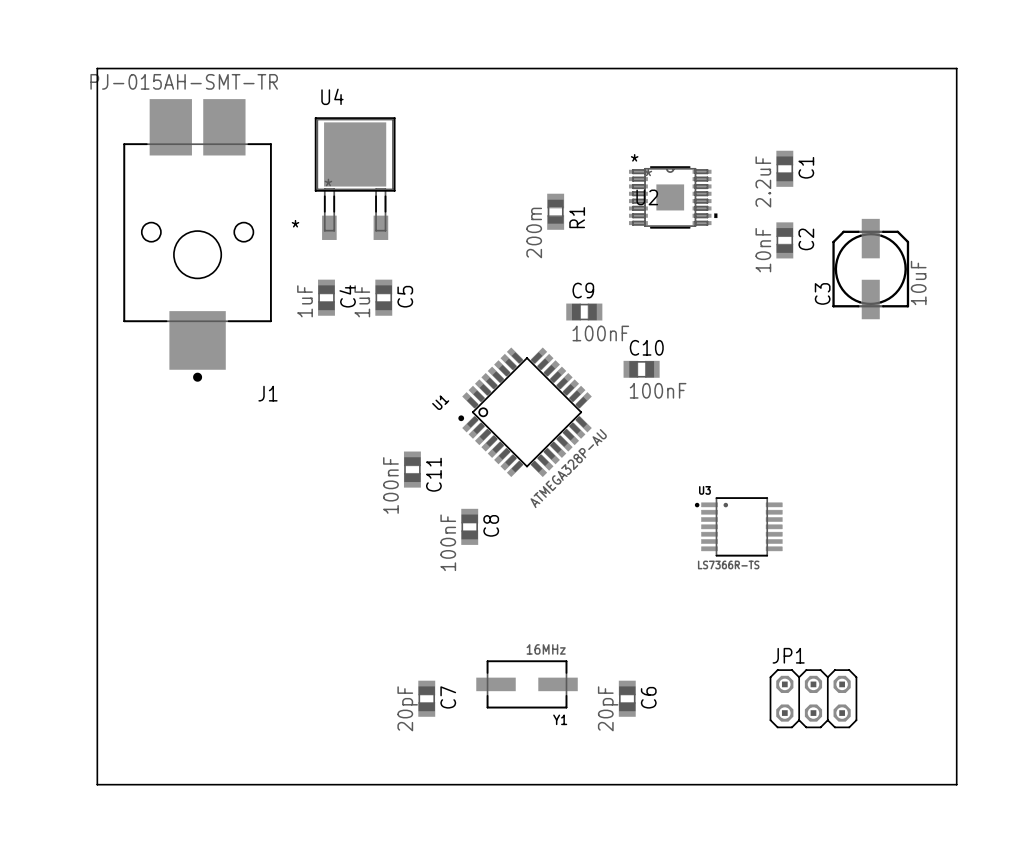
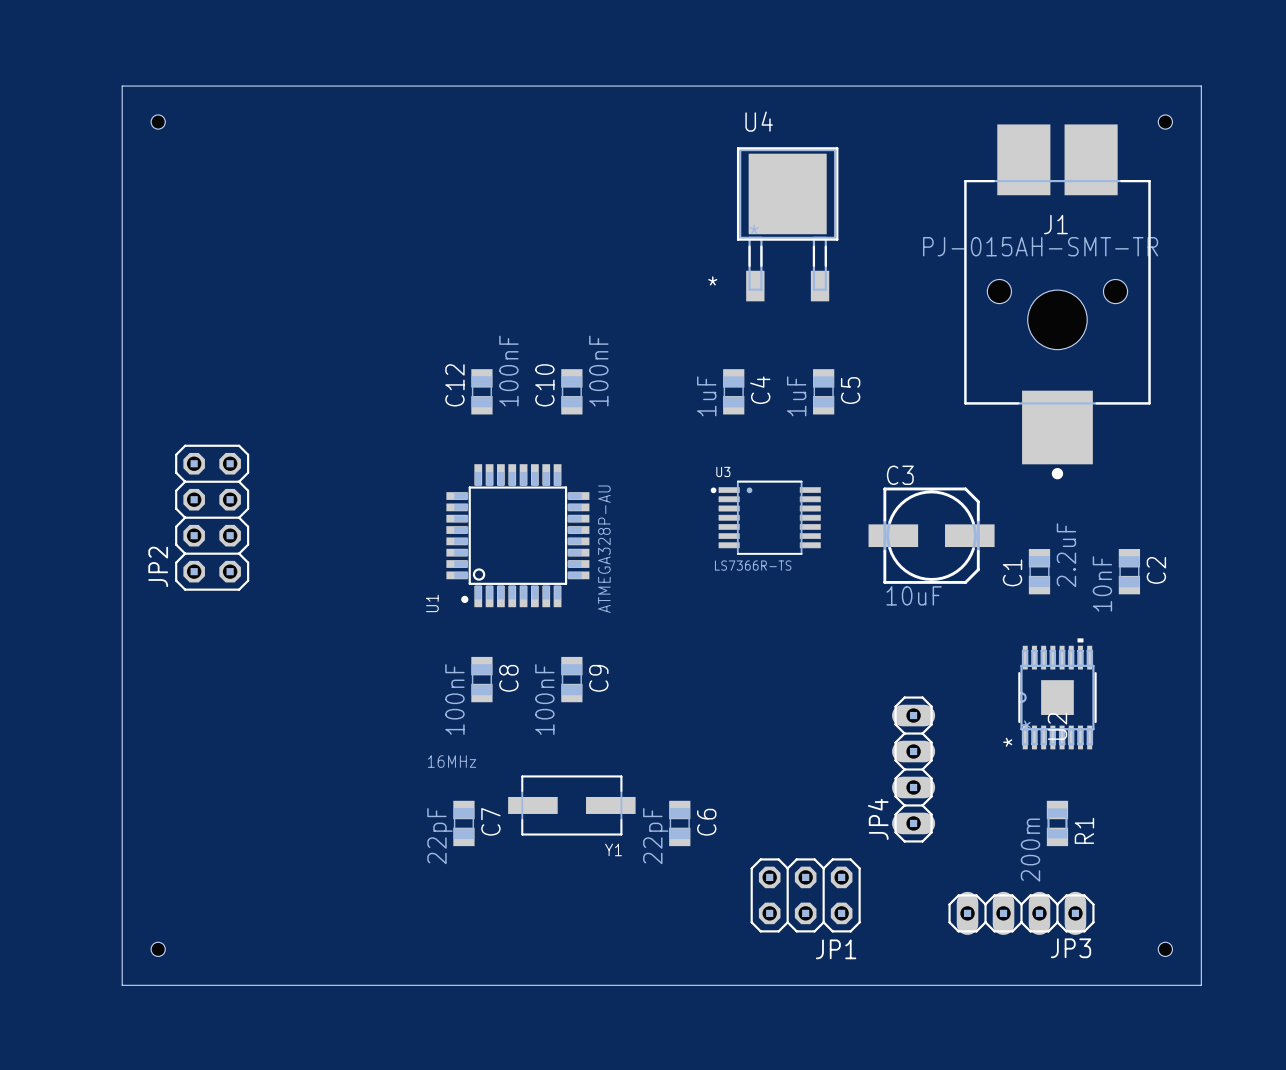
J1 value position: PJ-015AH-SMT-TR (184, 81) -> PJ-015AH-SMT-TR (1040, 246)
hole: none -> (158, 122)
hole: none -> (1165, 122)
C1 name position: C1 (806, 167) -> C1 (1012, 572)
C1 position: (784, 168) -> (1039, 571)
U4 position: (355, 178) -> (787, 224)
C1 value position: 2.2uF (763, 181) -> 2.2uF (1066, 555)
U2 rotation: 0° (673, 197) -> 90° counterclockwise (1057, 693)
U2 position: (673, 197) -> (1057, 693)
R1 position: (555, 211) -> (1057, 823)
J1 position: (197, 240) -> (1057, 301)
C2 position: (784, 240) -> (1129, 571)
C3 rotation: 0° (870, 269) -> 90° clockwise (931, 535)
C3 position: (870, 269) -> (931, 535)
C4 position: (326, 297) -> (733, 391)
C5 position: (383, 297) -> (823, 391)
C12: none -> 100nF (481, 391)
C9 rotation: 0° (584, 312) -> 90° clockwise (571, 679)
C9 position: (584, 312) -> (571, 679)
C10 name position: C10 (646, 347) -> C10 (544, 385)
C10 rotation: 0° (641, 369) -> 90° clockwise (571, 391)
C10 position: (641, 369) -> (571, 391)
C10 value position: 100nF (658, 390) -> 100nF (598, 371)
J1 name position: J1 (268, 393) -> J1 (1055, 224)
JP2: none -> (212, 517)
U1 rotation: 0° (525, 412) -> 45° counterclockwise (517, 535)
U1 position: (525, 412) -> (517, 535)
C11: 100nF (412, 469) -> none
C8 position: (469, 526) -> (481, 679)
U3 position: (738, 526) -> (765, 517)
JP4: none -> (913, 769)
Y1 value position: 16MHz (546, 649) -> 16MHz (452, 761)
JP1 name position: JP1 (788, 655) -> JP1 (836, 949)
Y1 position: (527, 684) -> (571, 805)
C7 position: (426, 698) -> (463, 823)
C6 position: (627, 698) -> (679, 823)
JP1 position: (813, 698) -> (805, 895)
C7 value: 20pF (407, 708) -> 22pF (439, 836)
C6 value: 20pF (608, 708) -> 22pF (655, 836)
JP3: none -> (1021, 913)
hole: none -> (158, 949)
hole: none -> (1165, 949)

